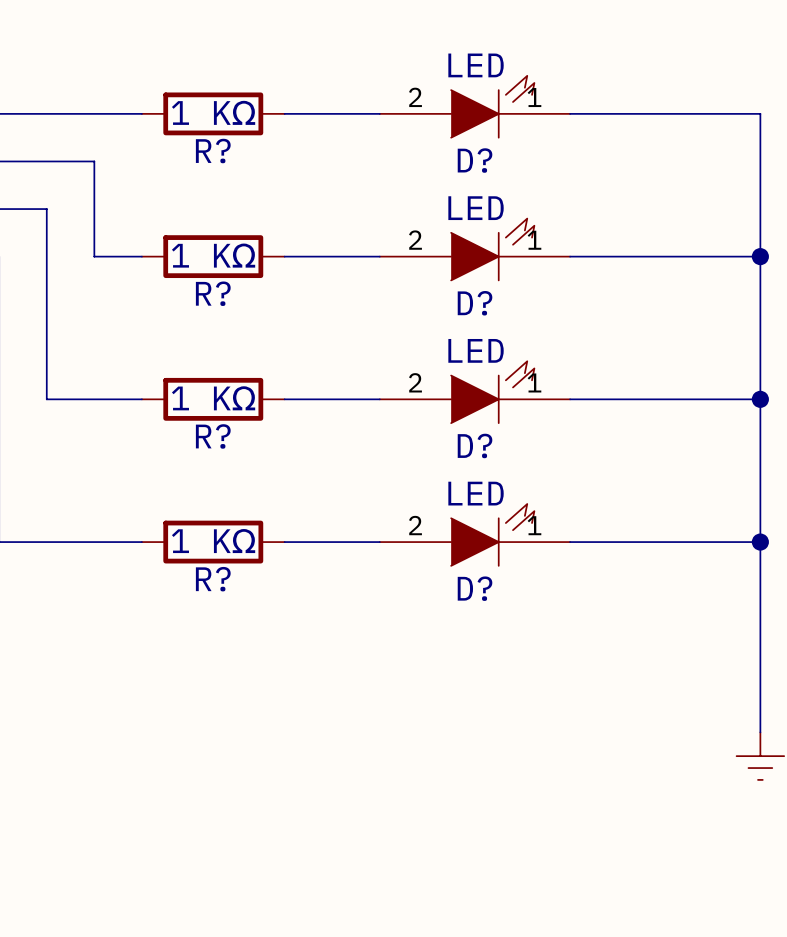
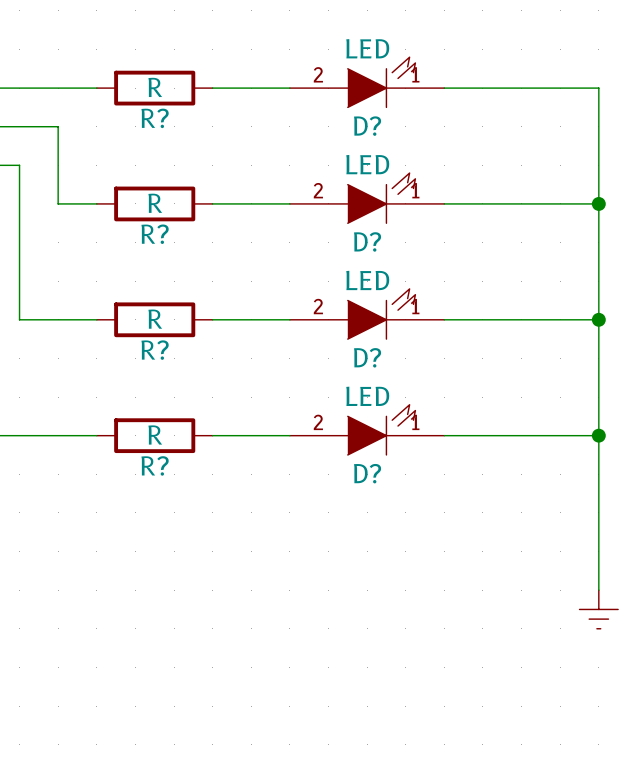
R? value: 1 KΩ (213, 112) -> R (155, 87)
R? value: 1 KΩ (213, 255) -> R (155, 203)
R? value: 1 KΩ (213, 398) -> R (155, 319)
R? value: 1 KΩ (213, 541) -> R (155, 434)

